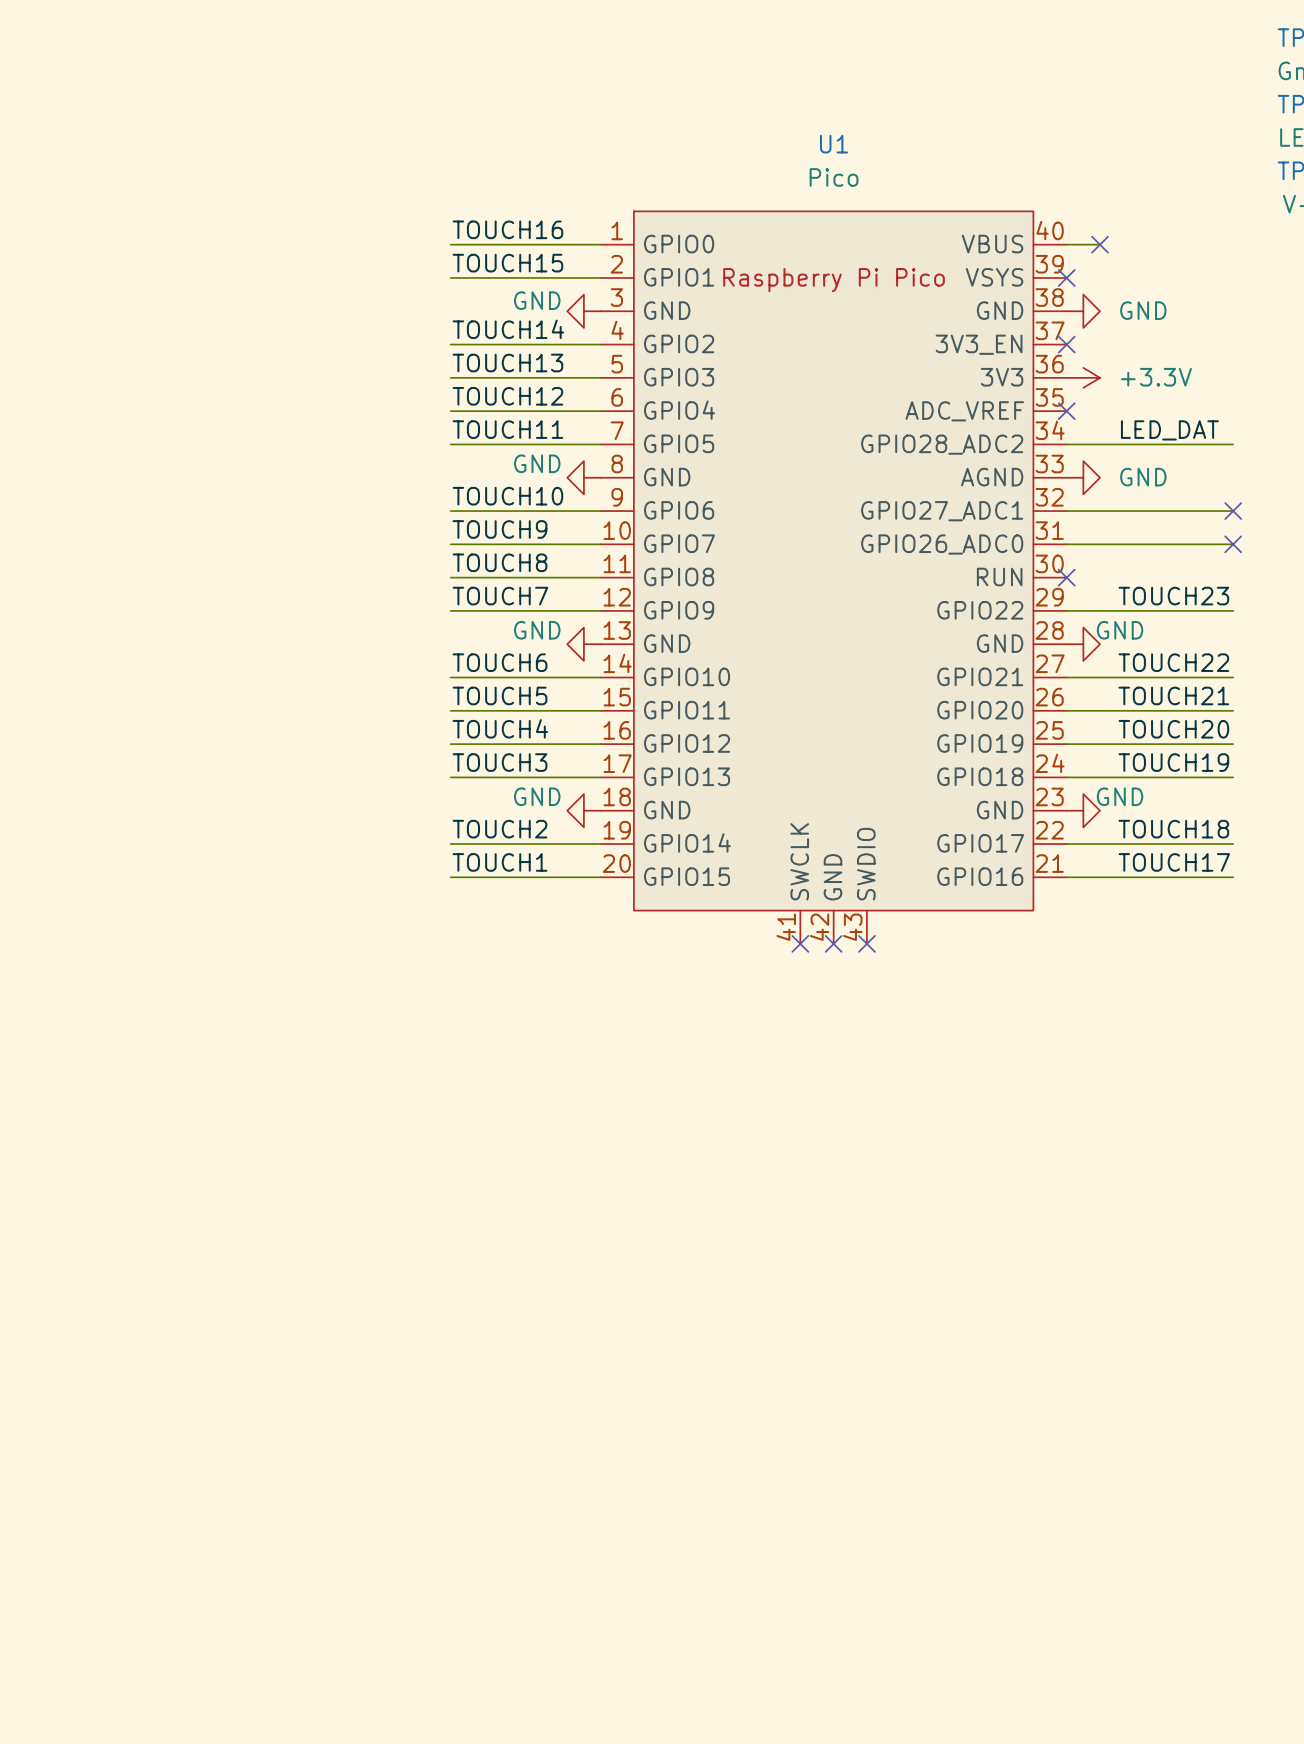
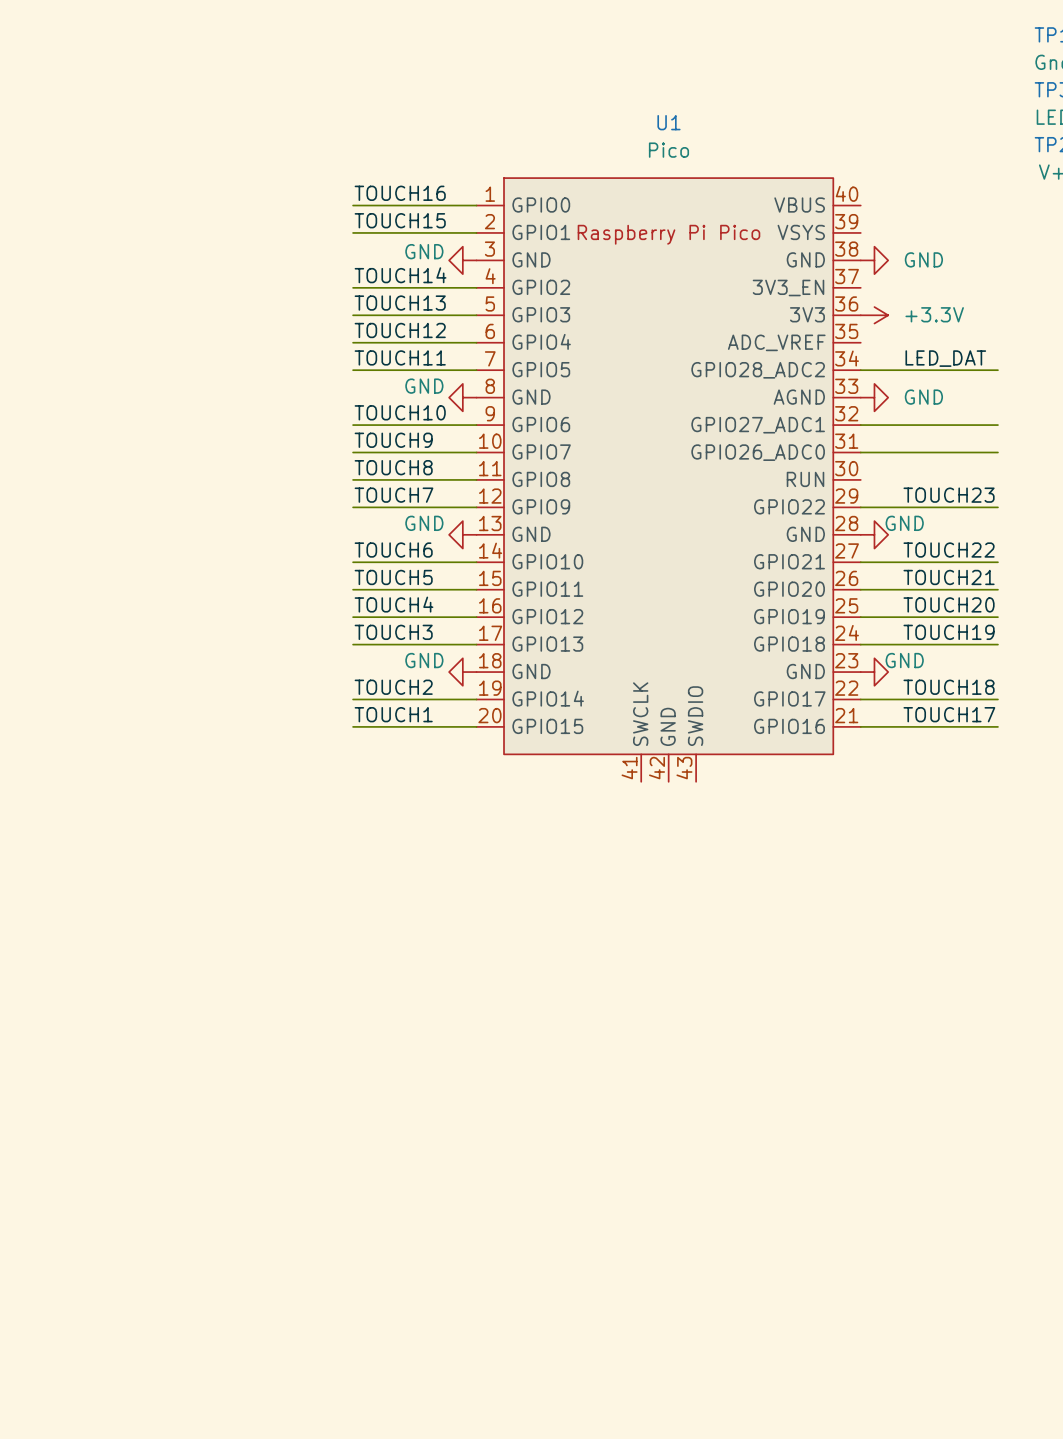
wire: (1066, 244) (1100, 244) -> none
no-connect mark: (1100, 244) -> none
no-connect mark: (1066, 277) -> none
no-connect mark: (1066, 344) -> none
no-connect mark: (1066, 411) -> none
no-connect mark: (1233, 511) -> none
no-connect mark: (1233, 544) -> none
no-connect mark: (1066, 577) -> none
no-connect mark: (800, 943) -> none
no-connect mark: (833, 943) -> none
no-connect mark: (866, 943) -> none

